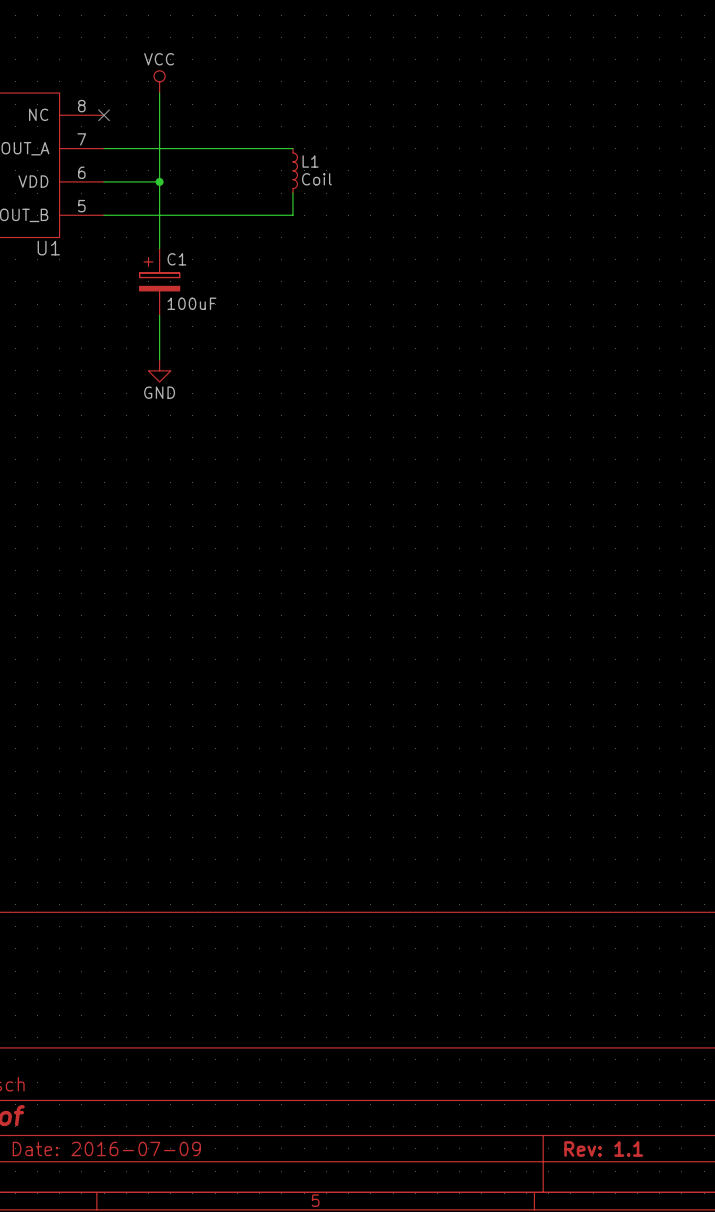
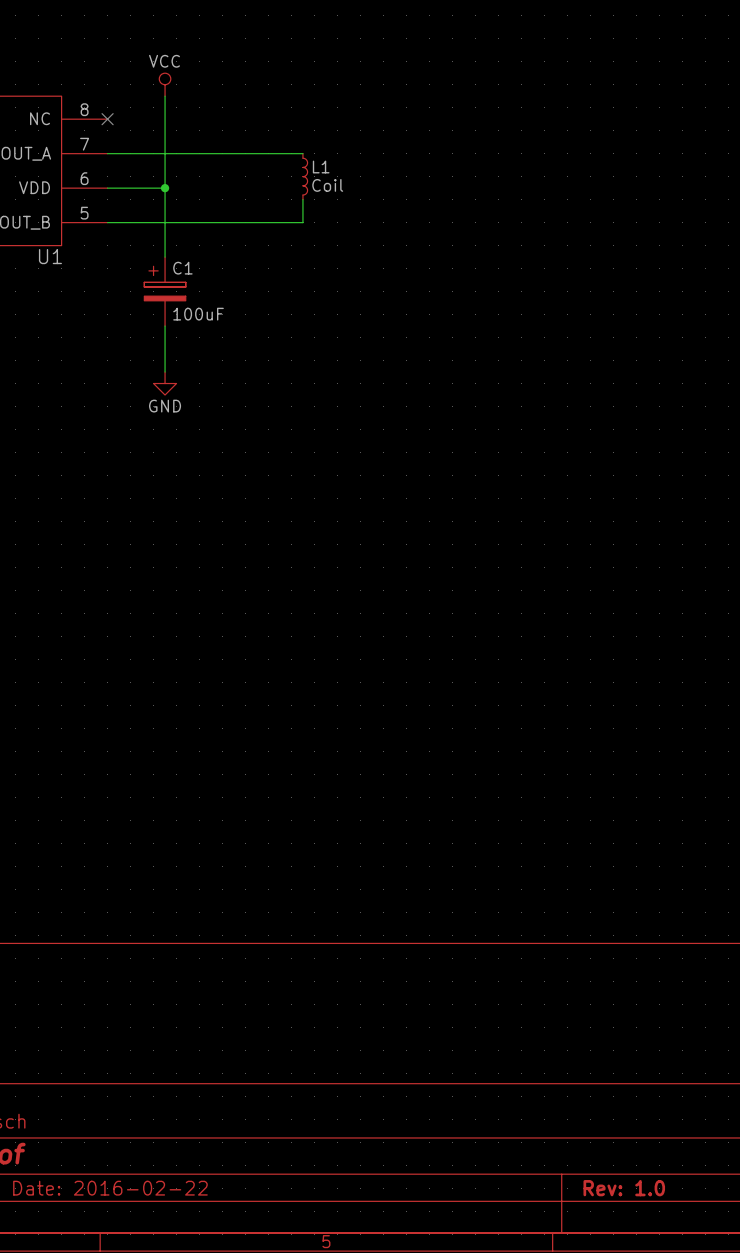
title block: Date: 2016-07-09 (106, 1148) -> Date: 2016-02-22 (110, 1188)
title block: Rev: 1.1 (603, 1148) -> Rev: 1.0 (624, 1188)

